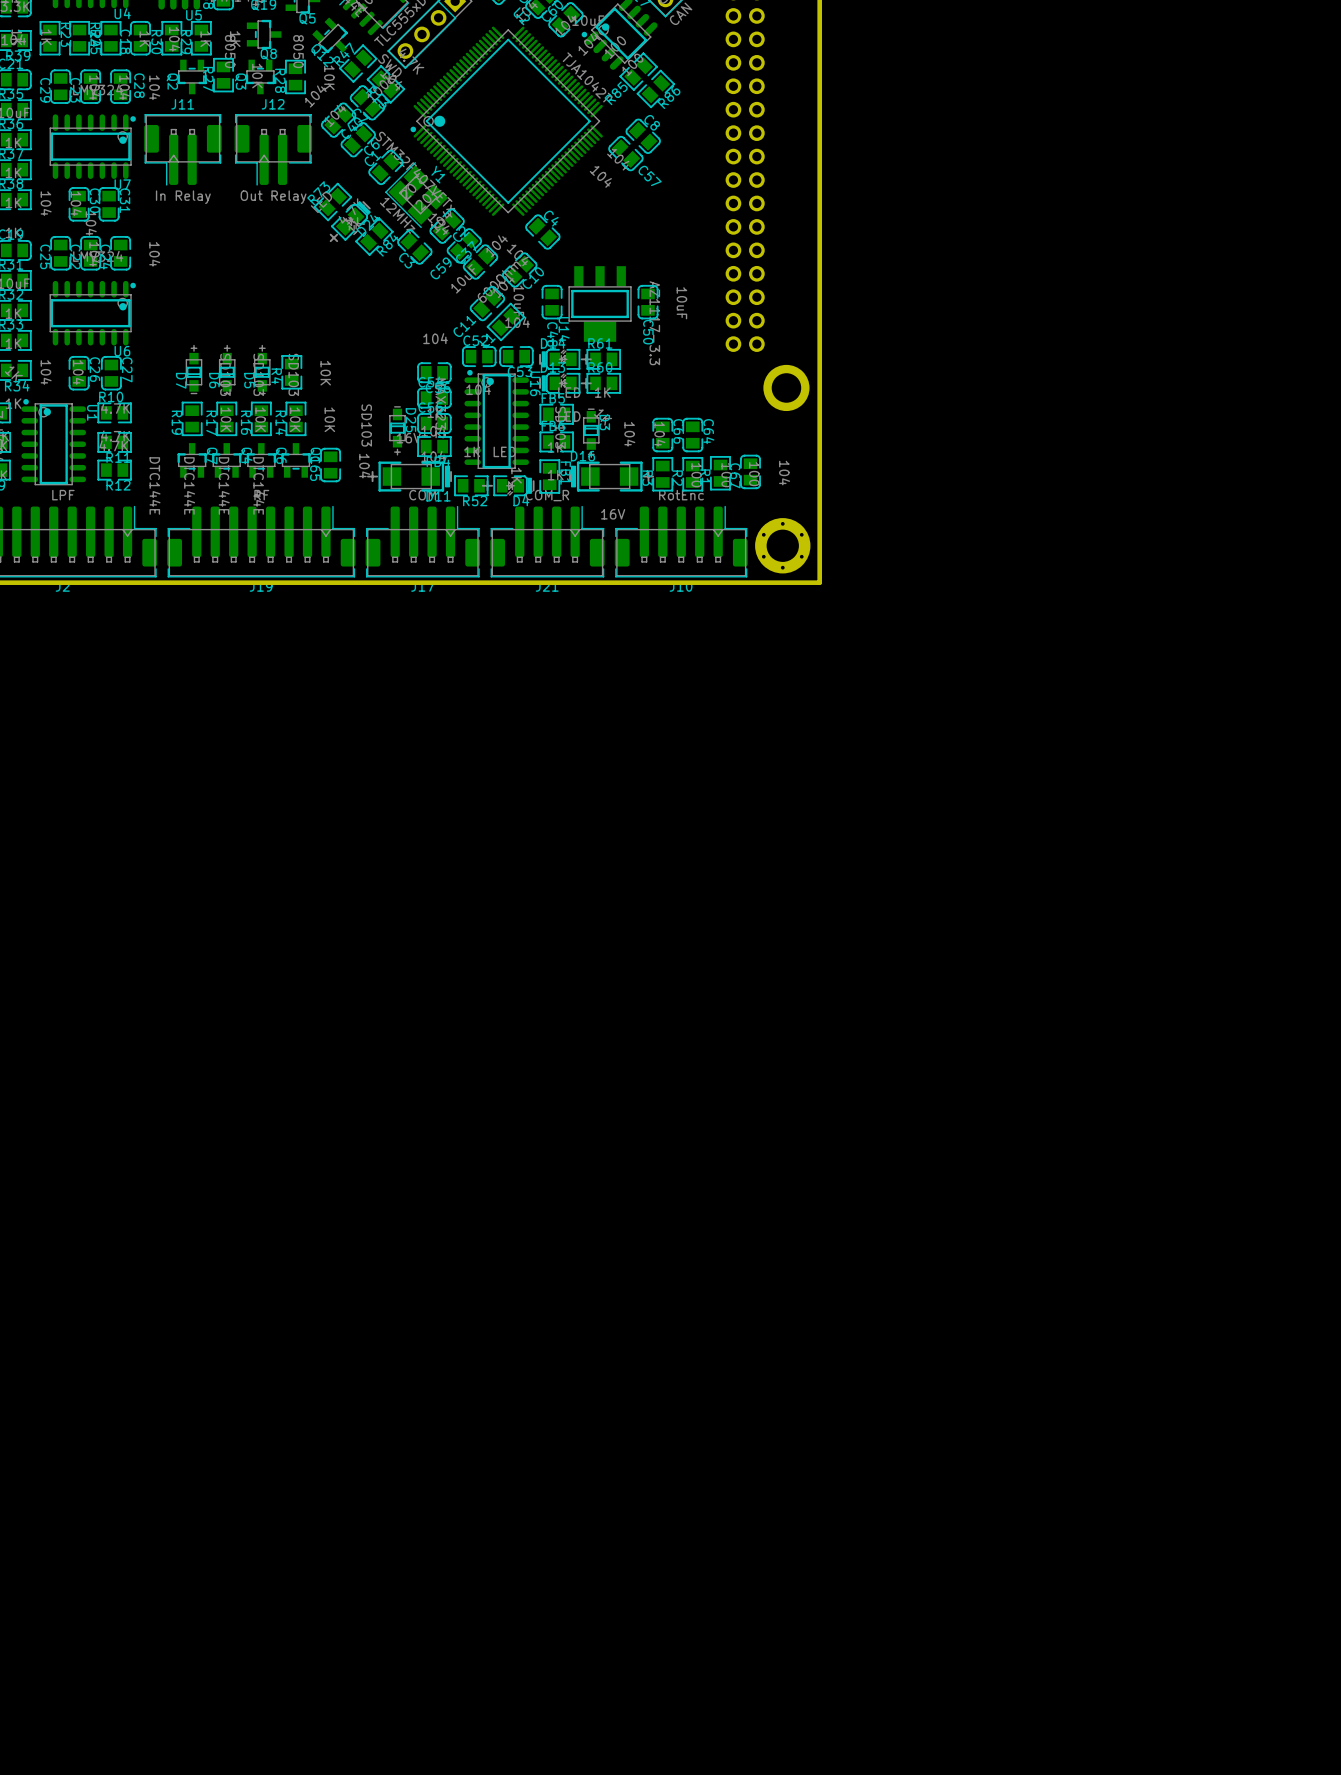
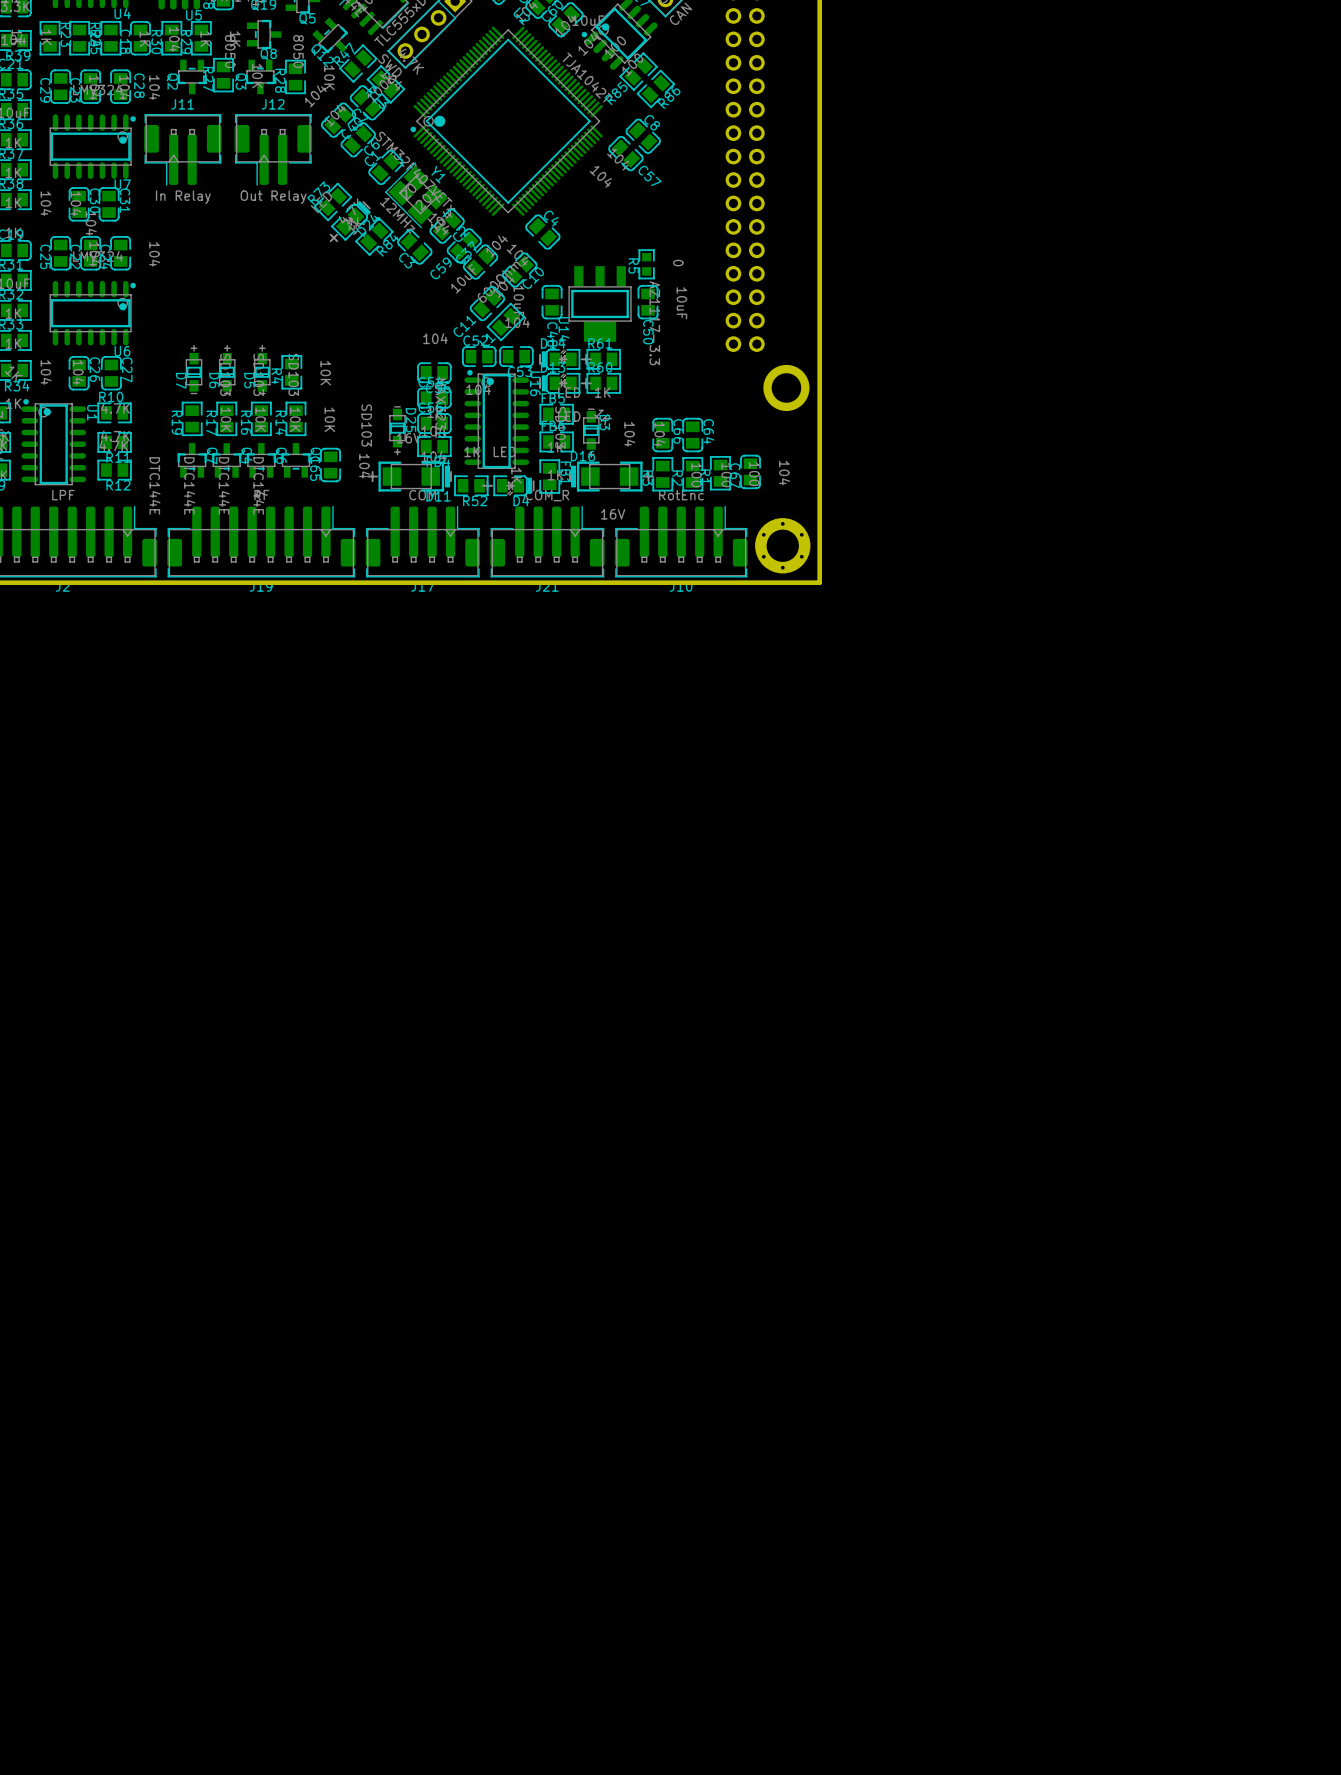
R5: none -> 0 (646, 264)

